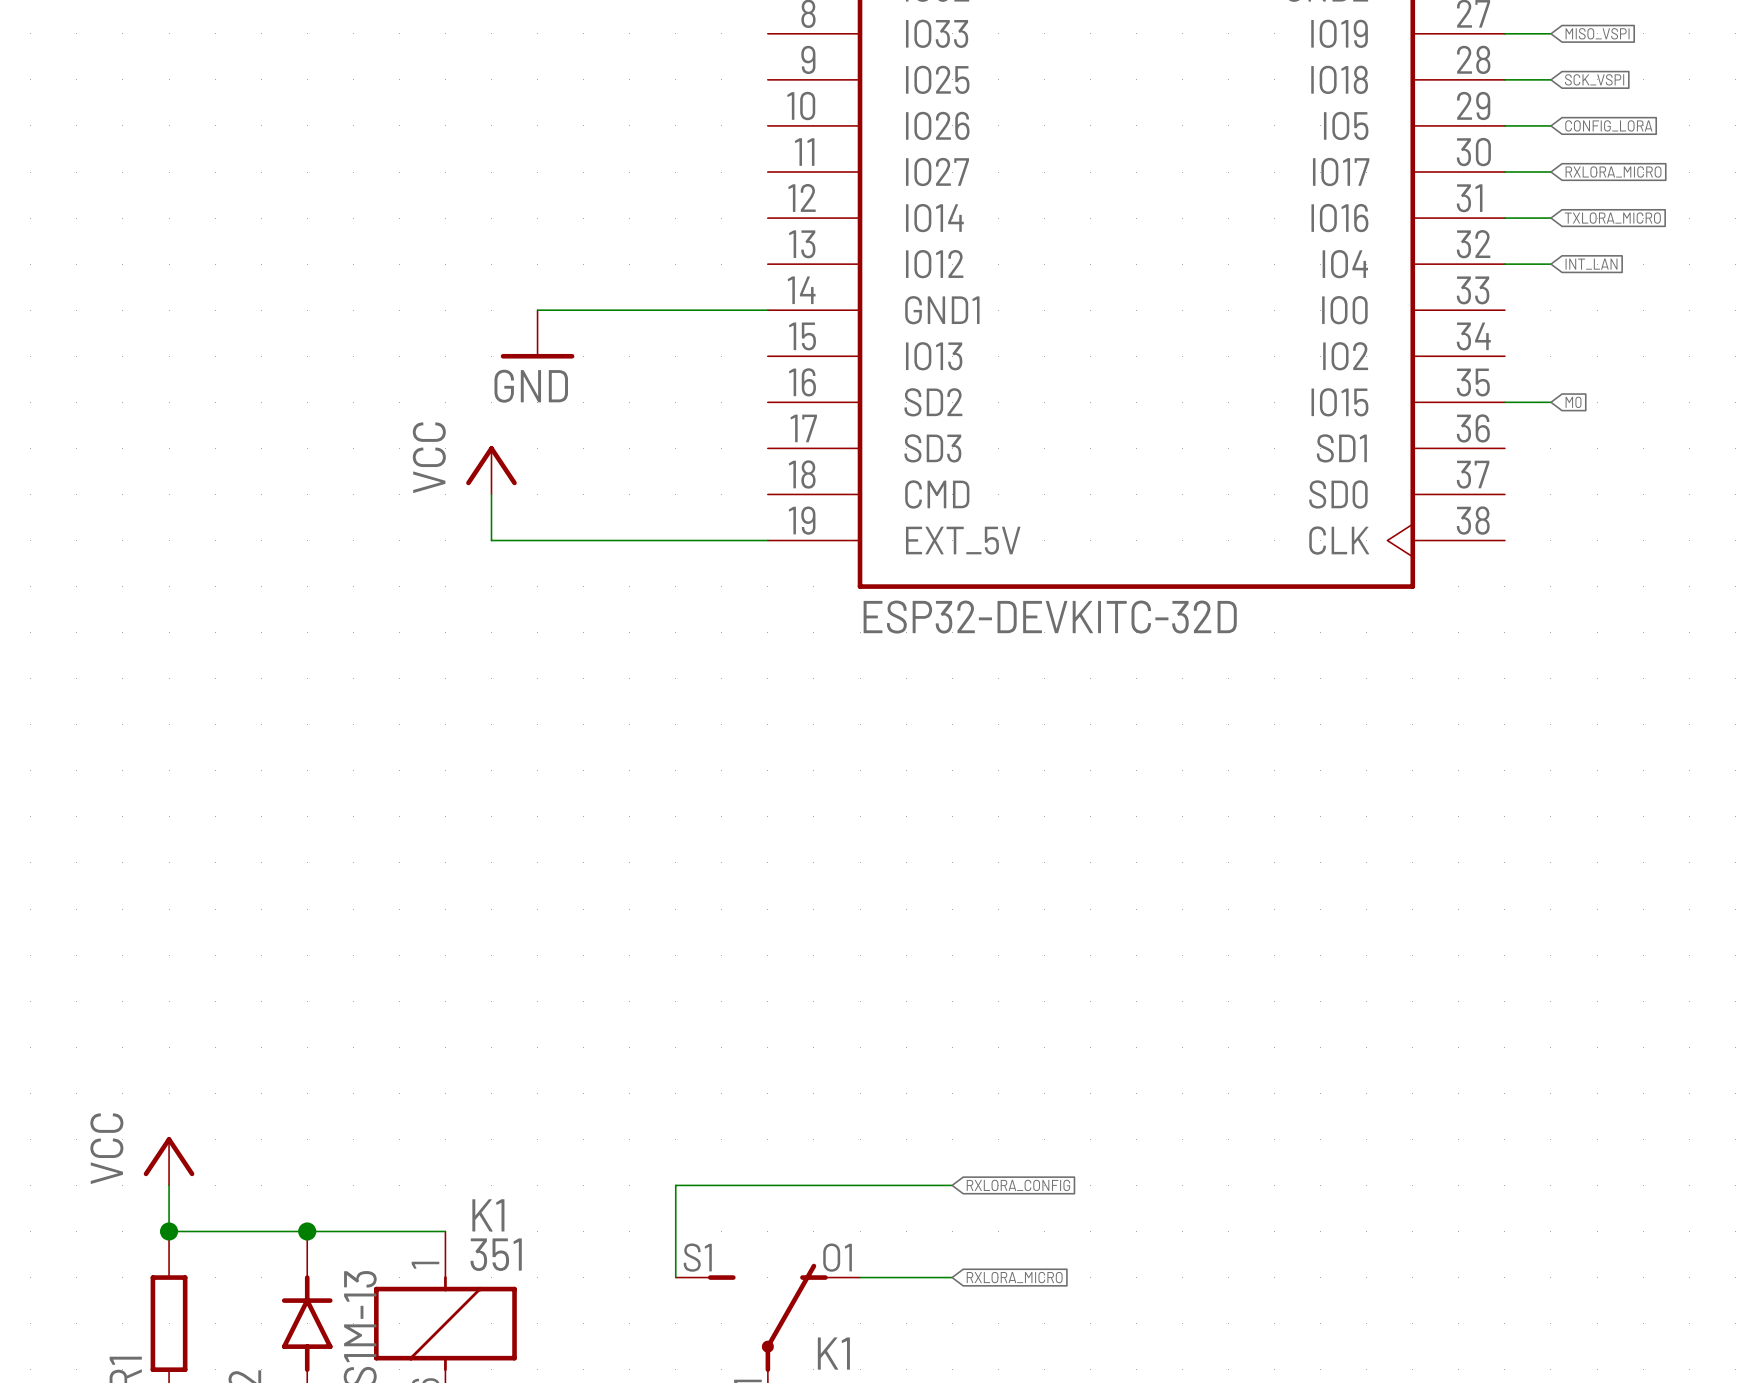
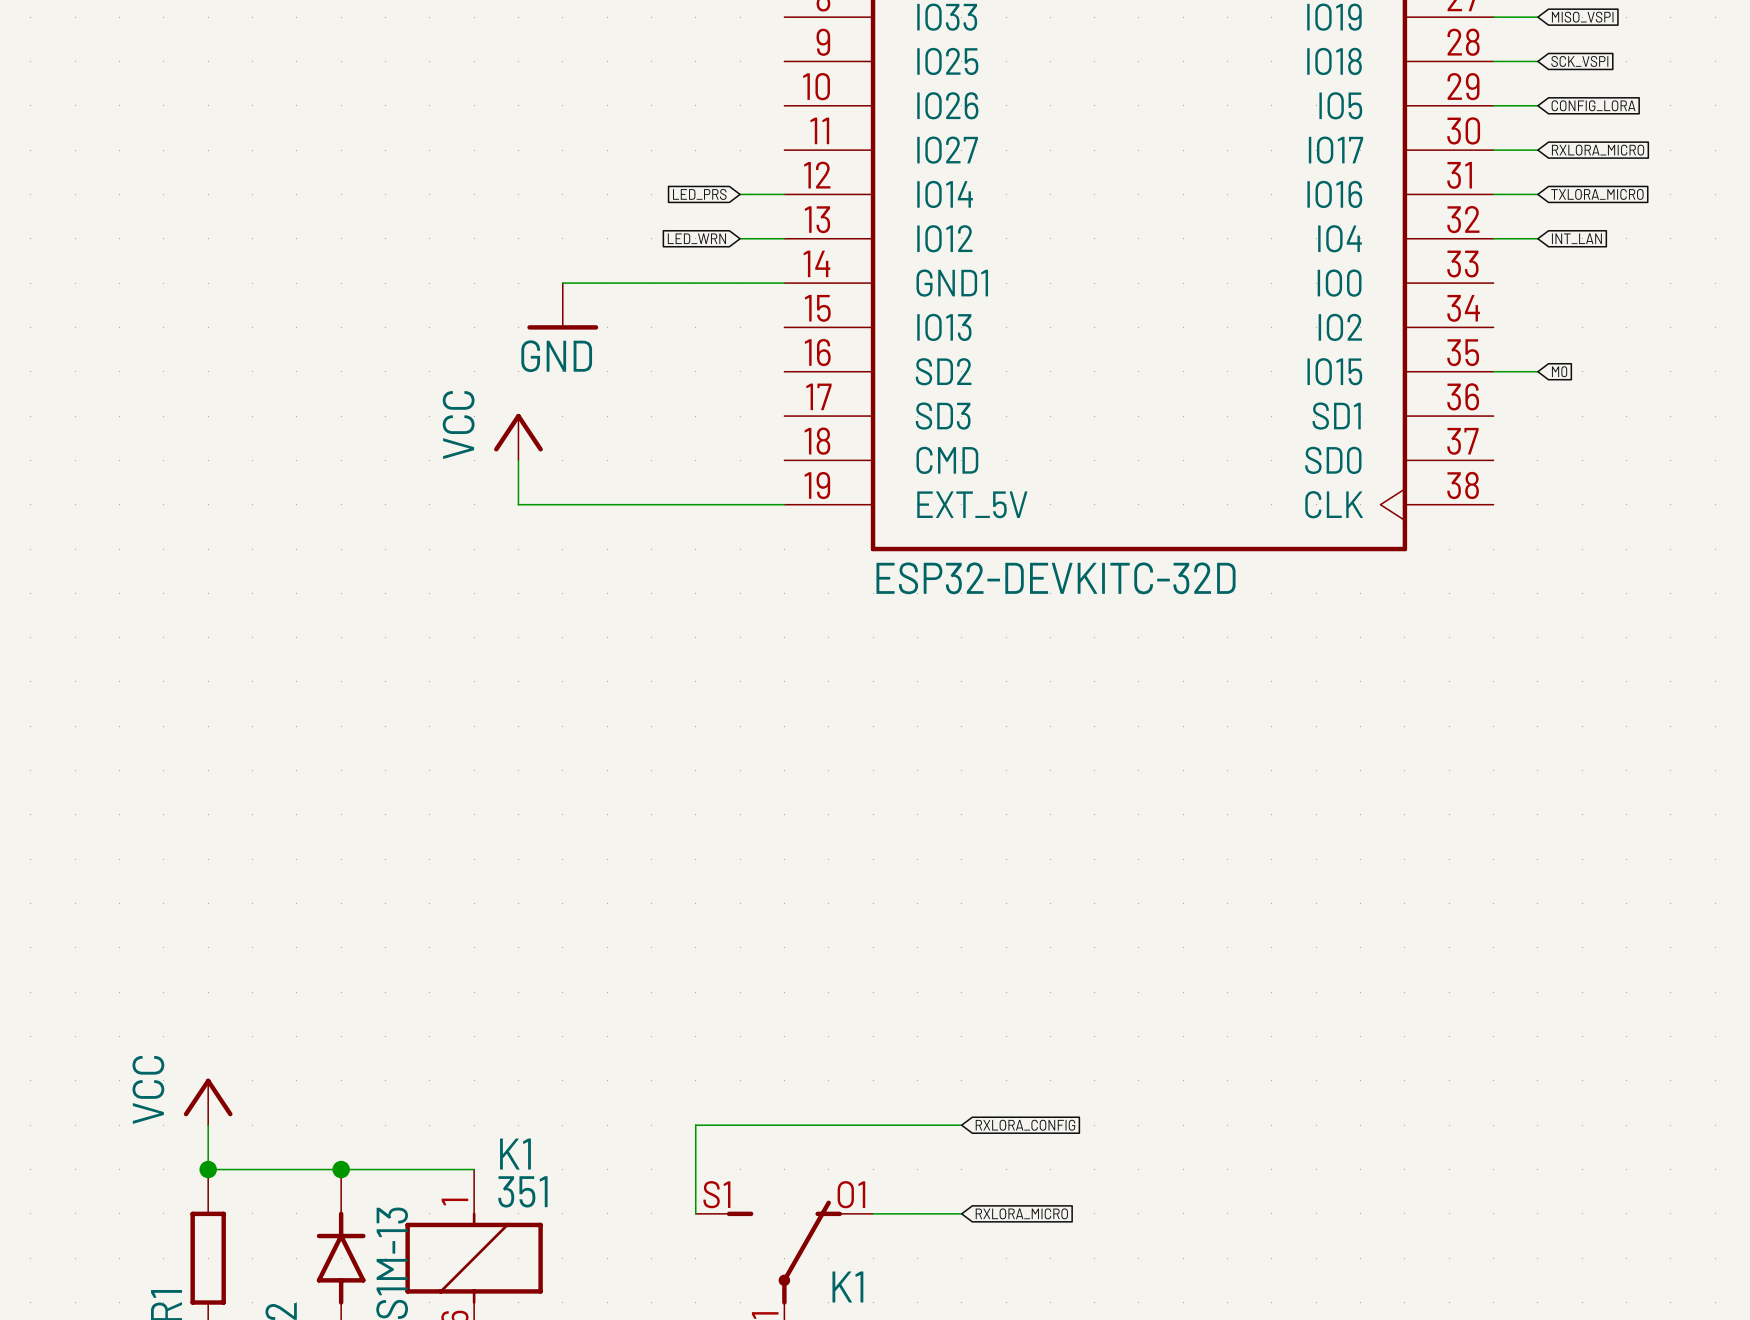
global label: none -> LED_PRS (699, 194)
wire: none -> (740, 194) (784, 194)
global label: none -> LED_WRN (696, 238)
wire: none -> (740, 238) (784, 238)

